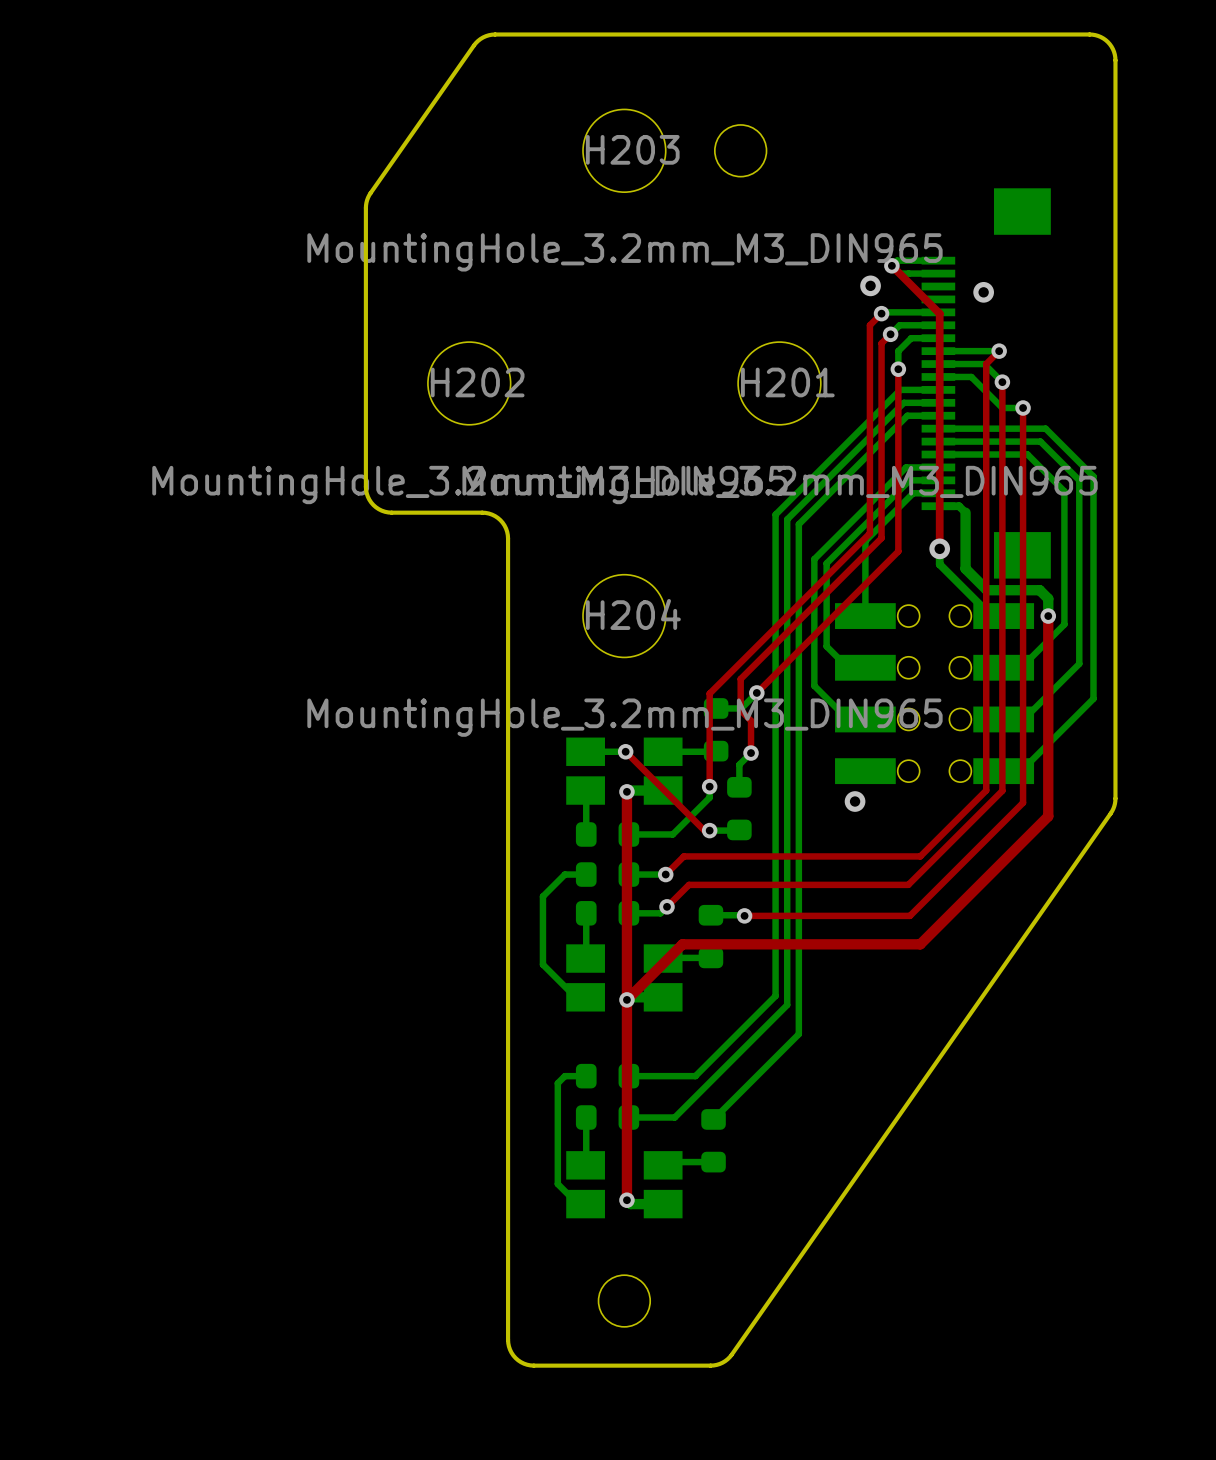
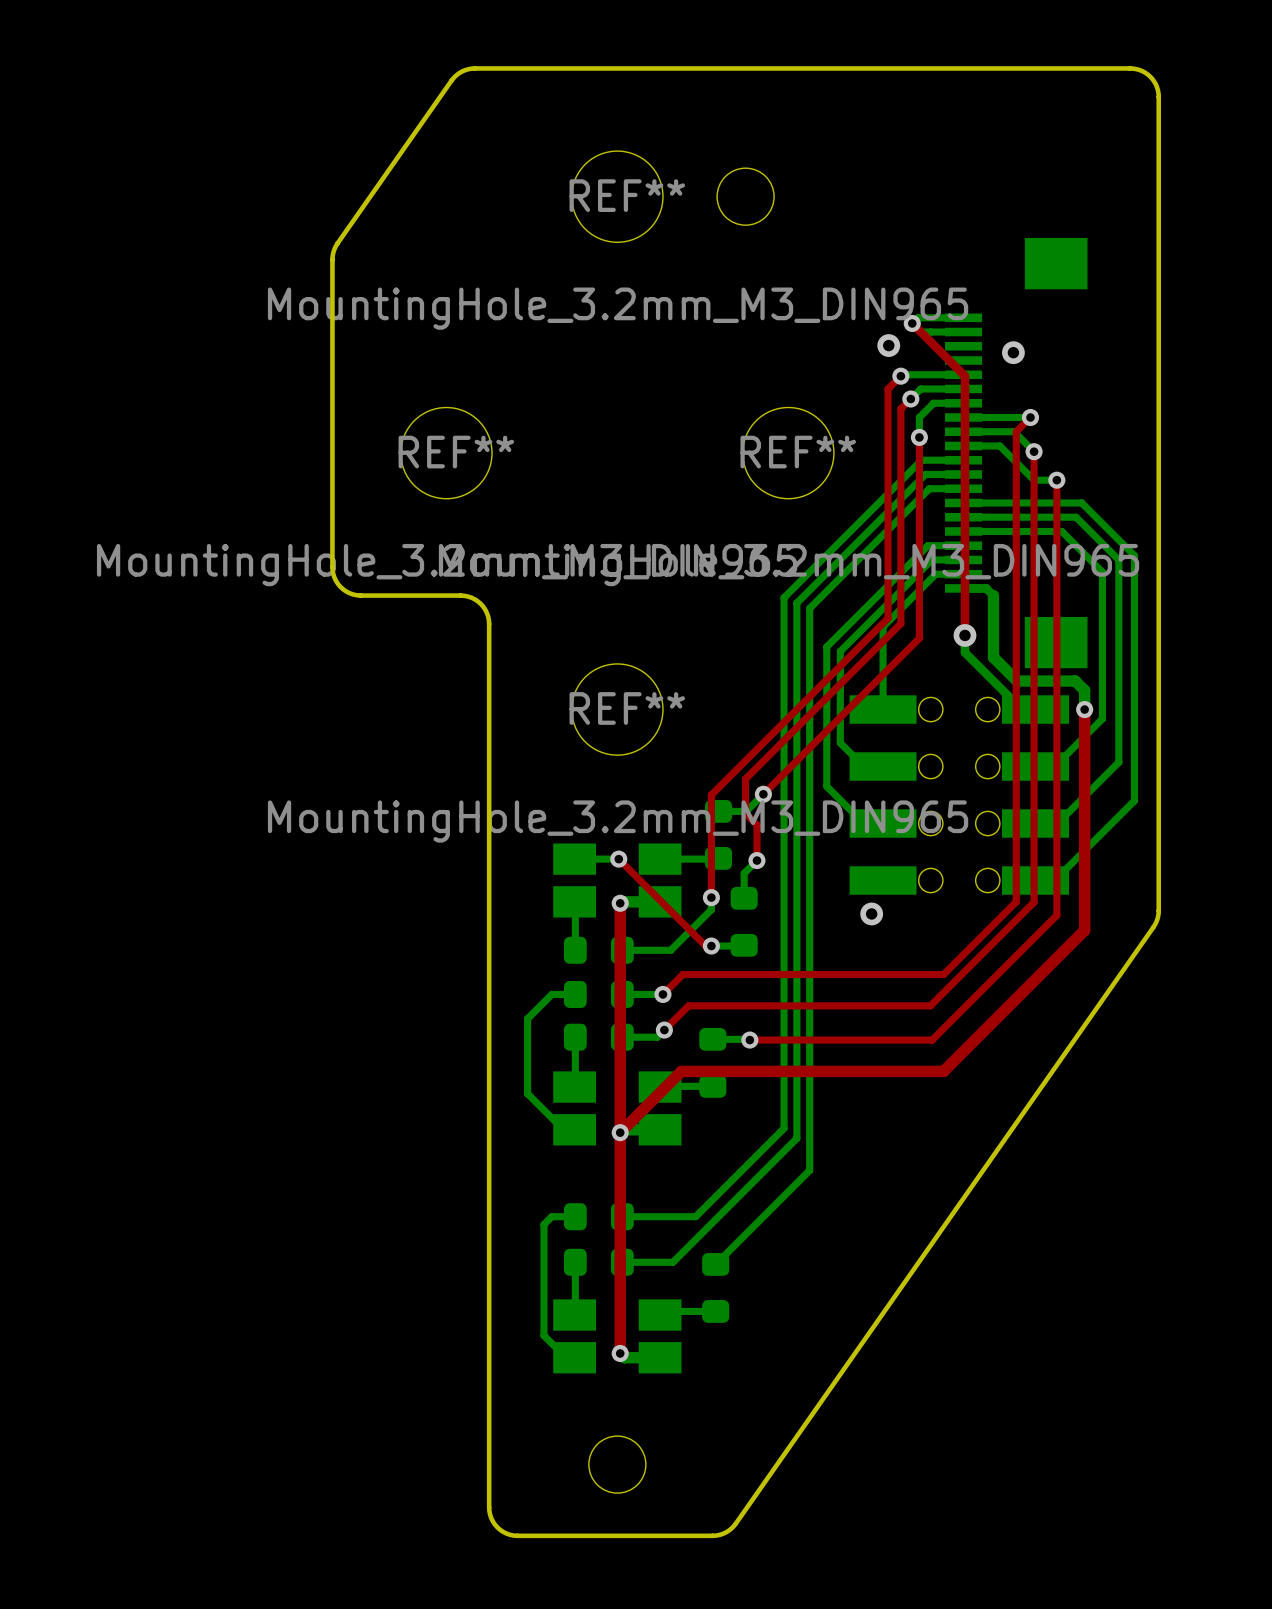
H203 name: H203 (632, 149) -> REF** (627, 195)
H202 name: H202 (477, 382) -> REF** (456, 452)
H201 name: H201 (787, 382) -> REF** (798, 452)
H204 name: H204 (633, 614) -> REF** (627, 708)

